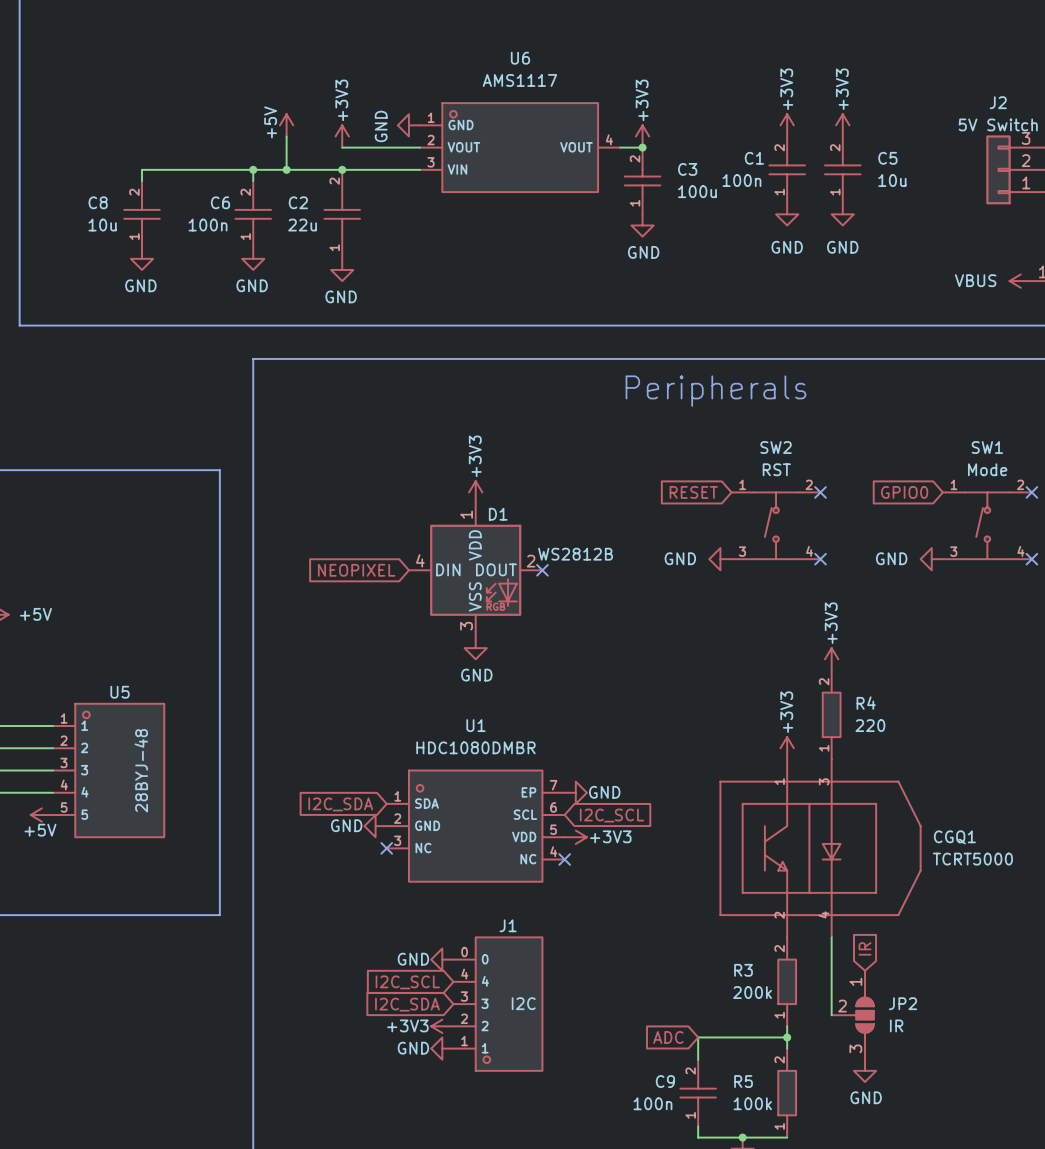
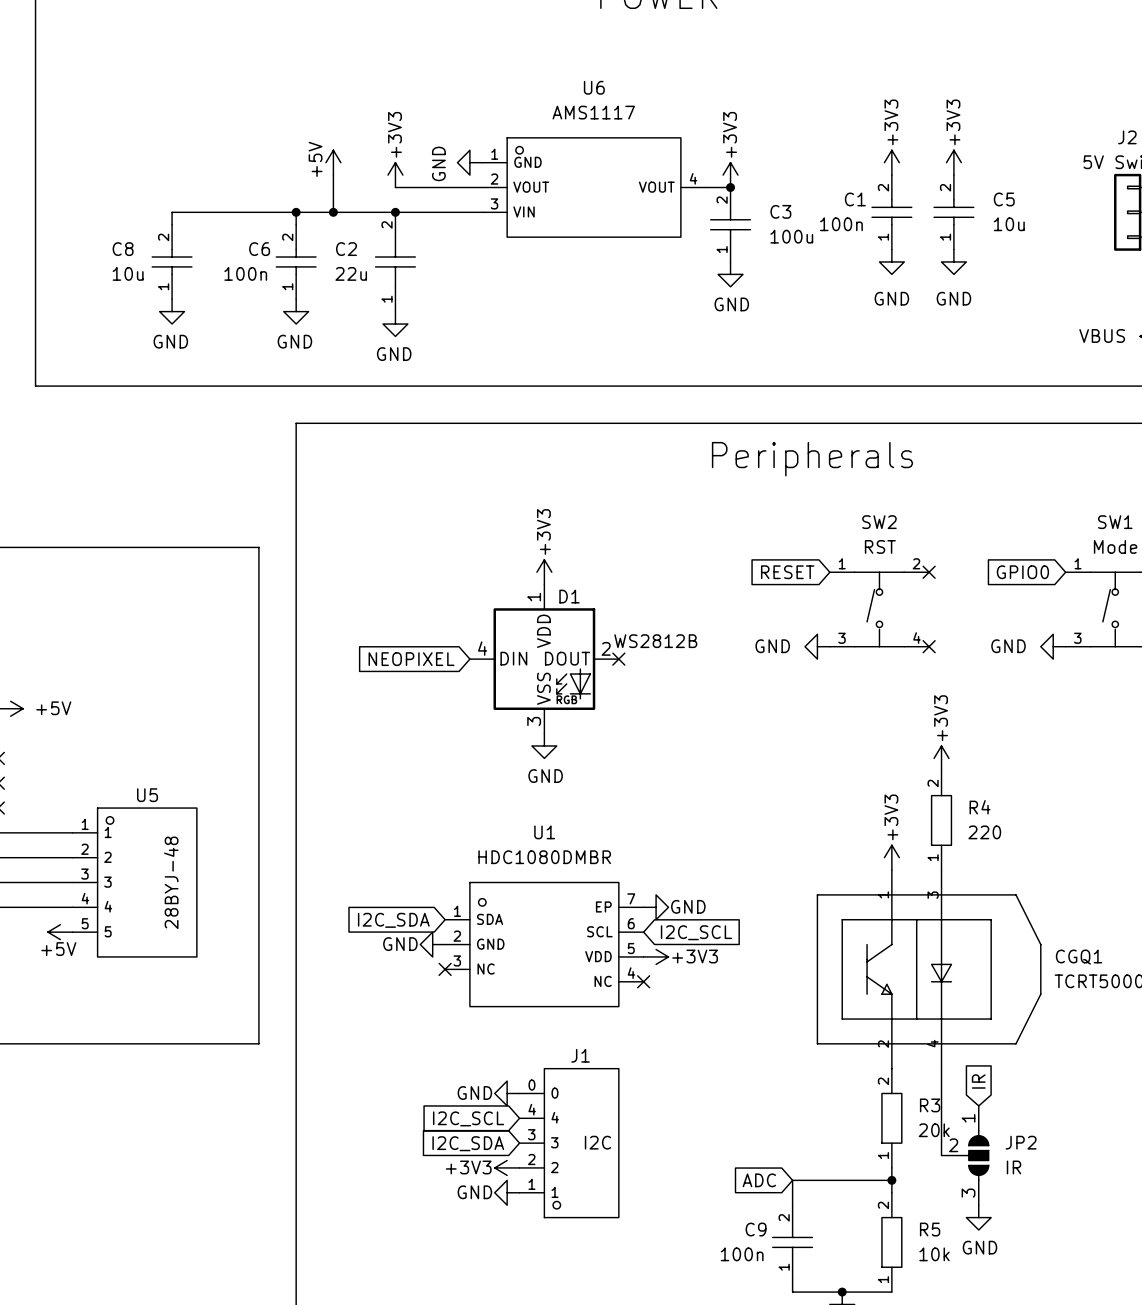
R3 name position: R3 (743, 970) -> R3 (930, 1105)
R3 value: 200k (752, 992) -> 20k (934, 1130)
R5 name position: R5 (743, 1081) -> R5 (930, 1229)
R5 value: 100k (752, 1103) -> 10k (934, 1254)

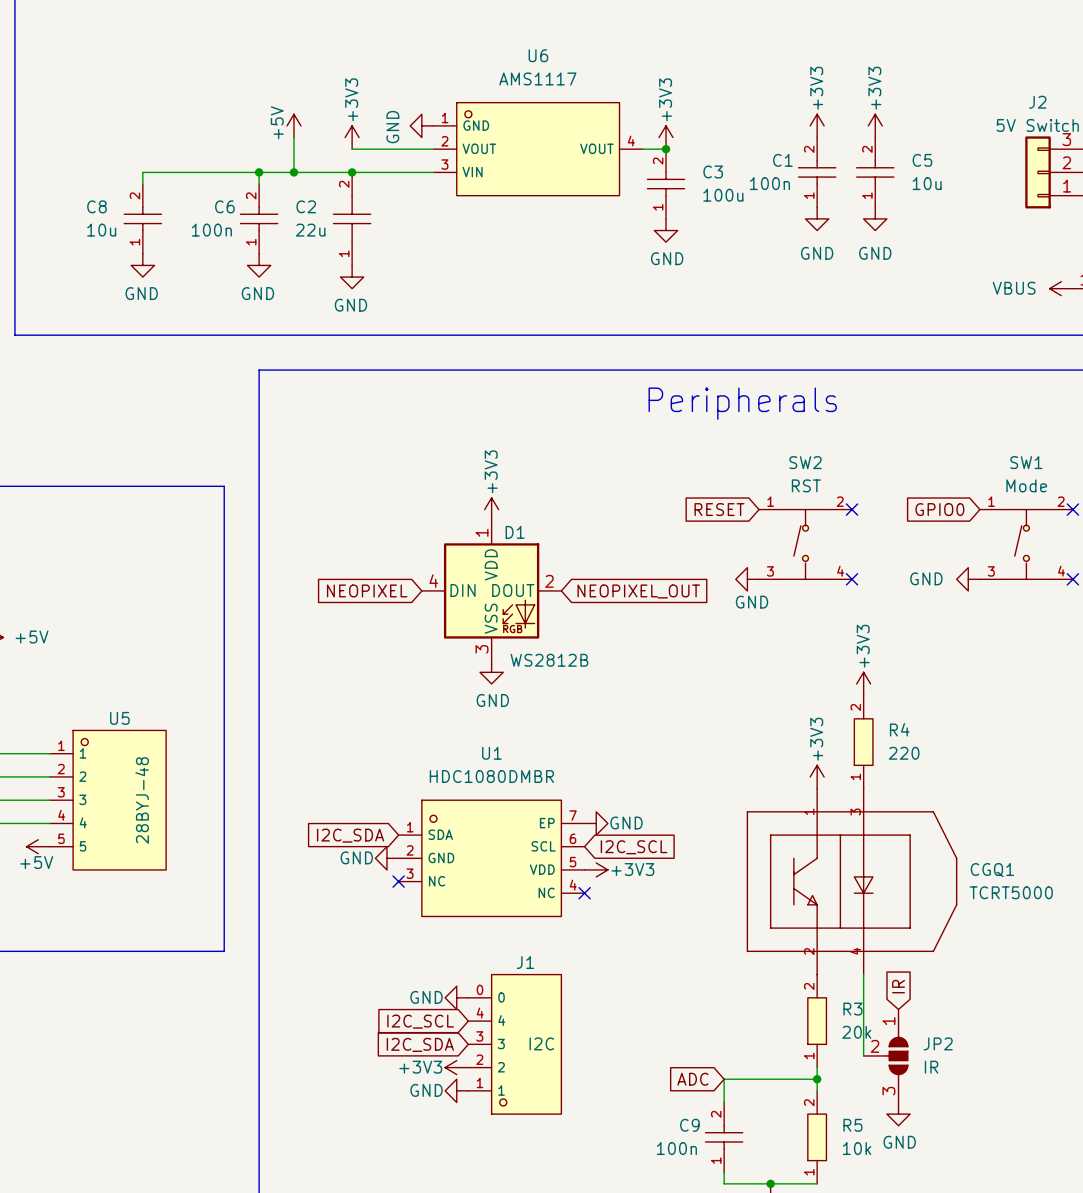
D1 value position: WS2812B (655, 641) -> WS2812B (549, 660)
power symbol text position: GND (772, 646) -> GND (752, 602)
no-connect mark: (618, 659) -> none
global label: none -> NEOPIXEL_OUT (638, 591)

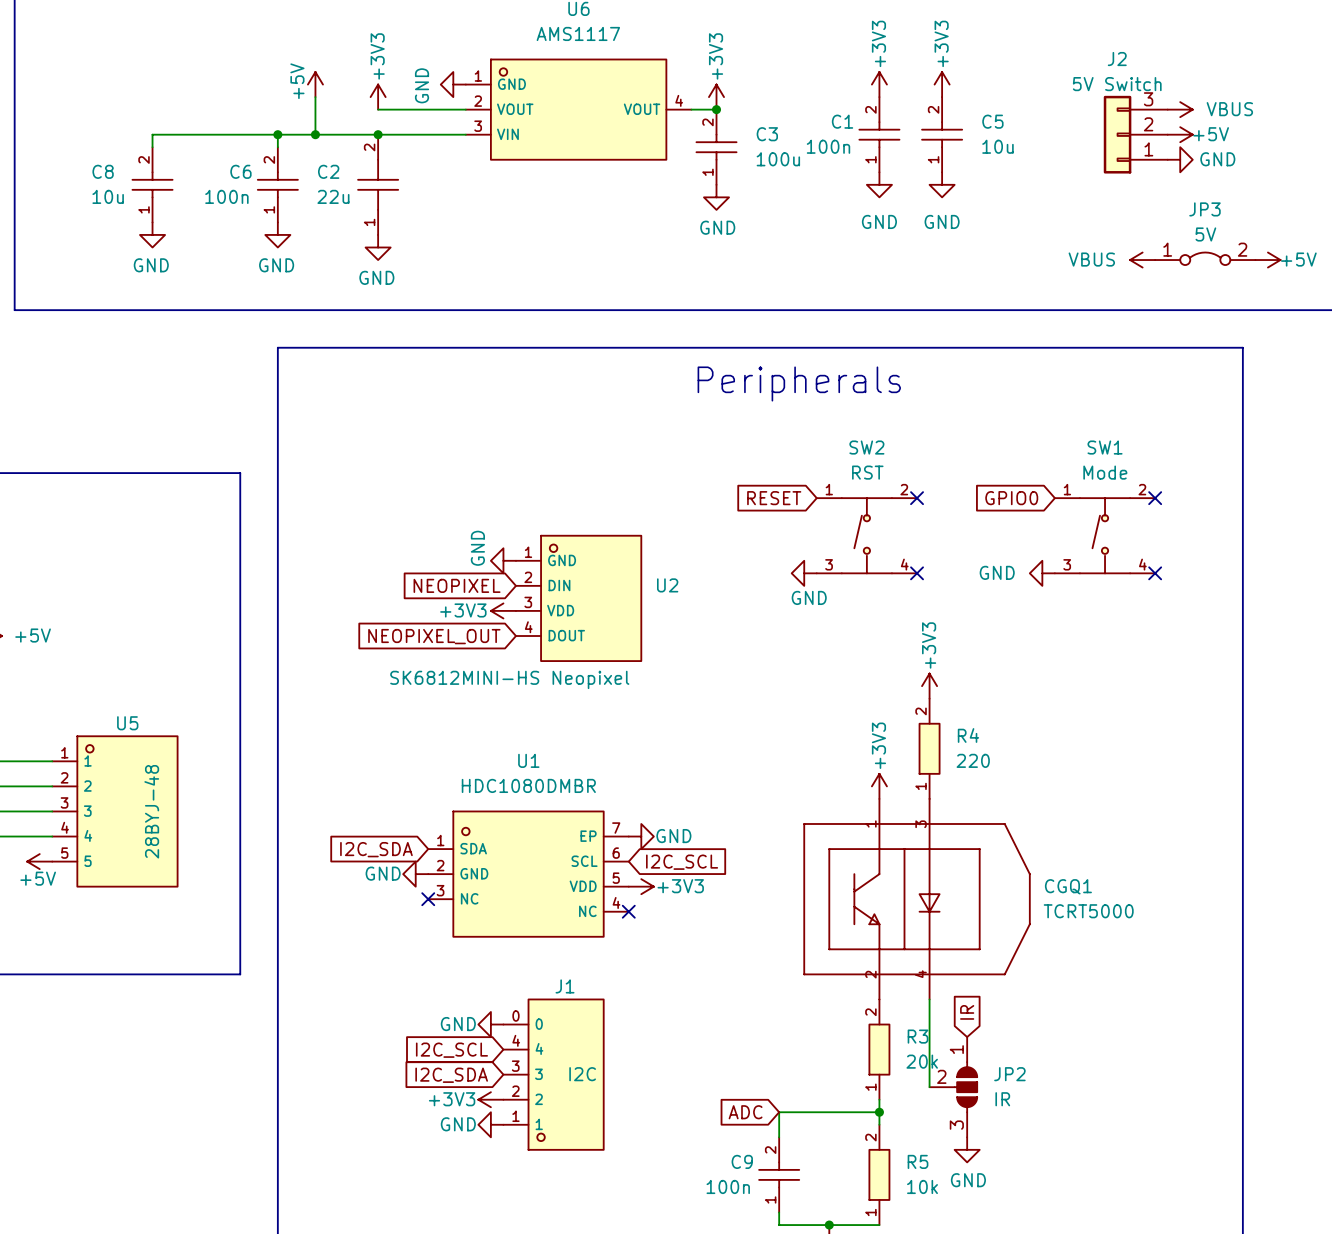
power symbol rotation: 0° (491, 509) -> 90° counterclockwise (503, 610)
power symbol position: +3V3 (491, 509) -> +3V3 (503, 610)
global label position: NEOPIXEL (367, 590) -> NEOPIXEL (457, 585)
D1: WS2812B (491, 590) -> none
global label rotation: 0° (638, 591) -> 180° (434, 636)
global label position: NEOPIXEL_OUT (638, 591) -> NEOPIXEL_OUT (434, 636)
U2: none -> SK6812MINI-HS Neopixel (578, 598)
power symbol rotation: 0° (491, 672) -> 90° clockwise (503, 560)
power symbol position: GND (491, 672) -> GND (503, 560)

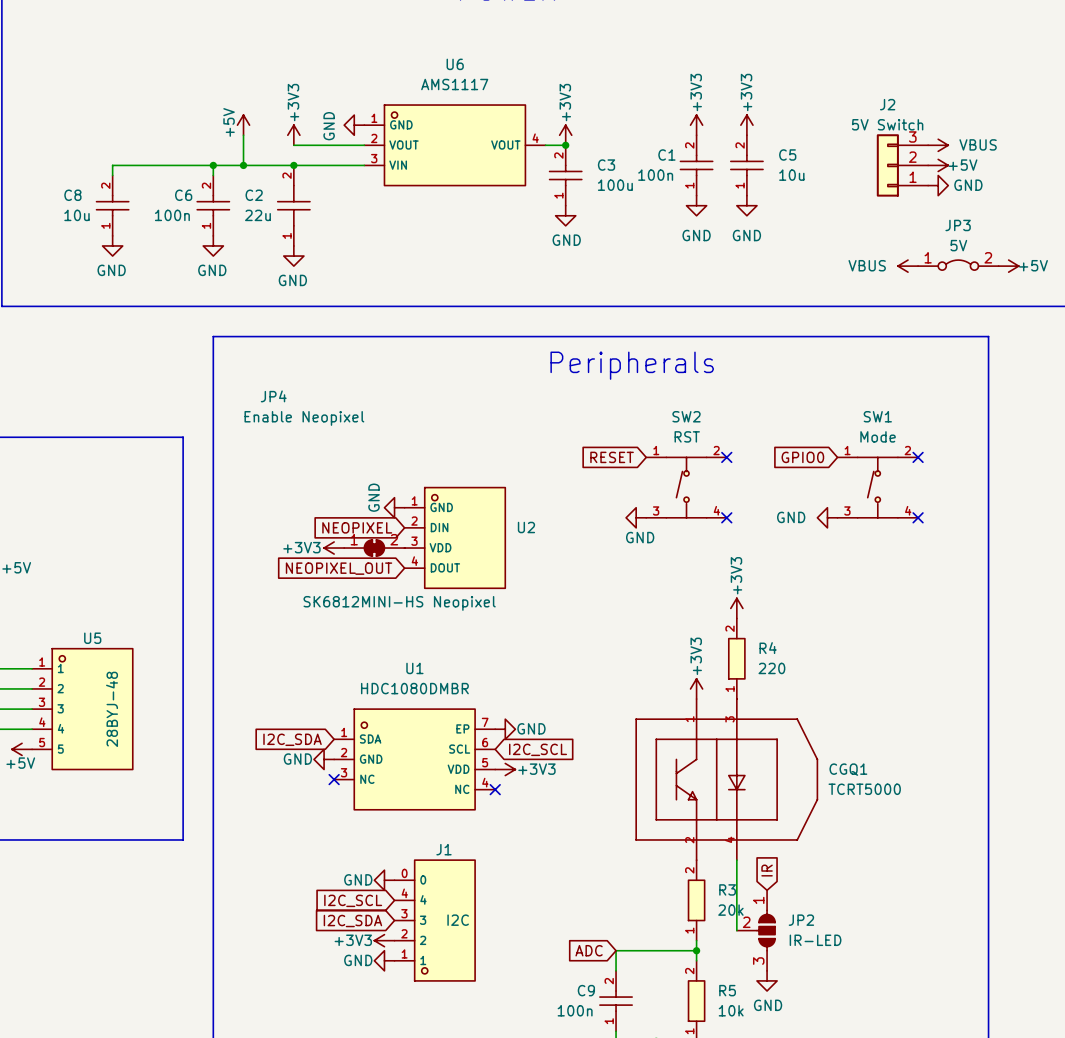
JP4: none -> Enable Neopixel (374, 548)
power symbol position: +3V3 (503, 610) -> +3V3 (334, 548)
JP2 value: IR (1002, 1099) -> IR-LED (815, 940)

